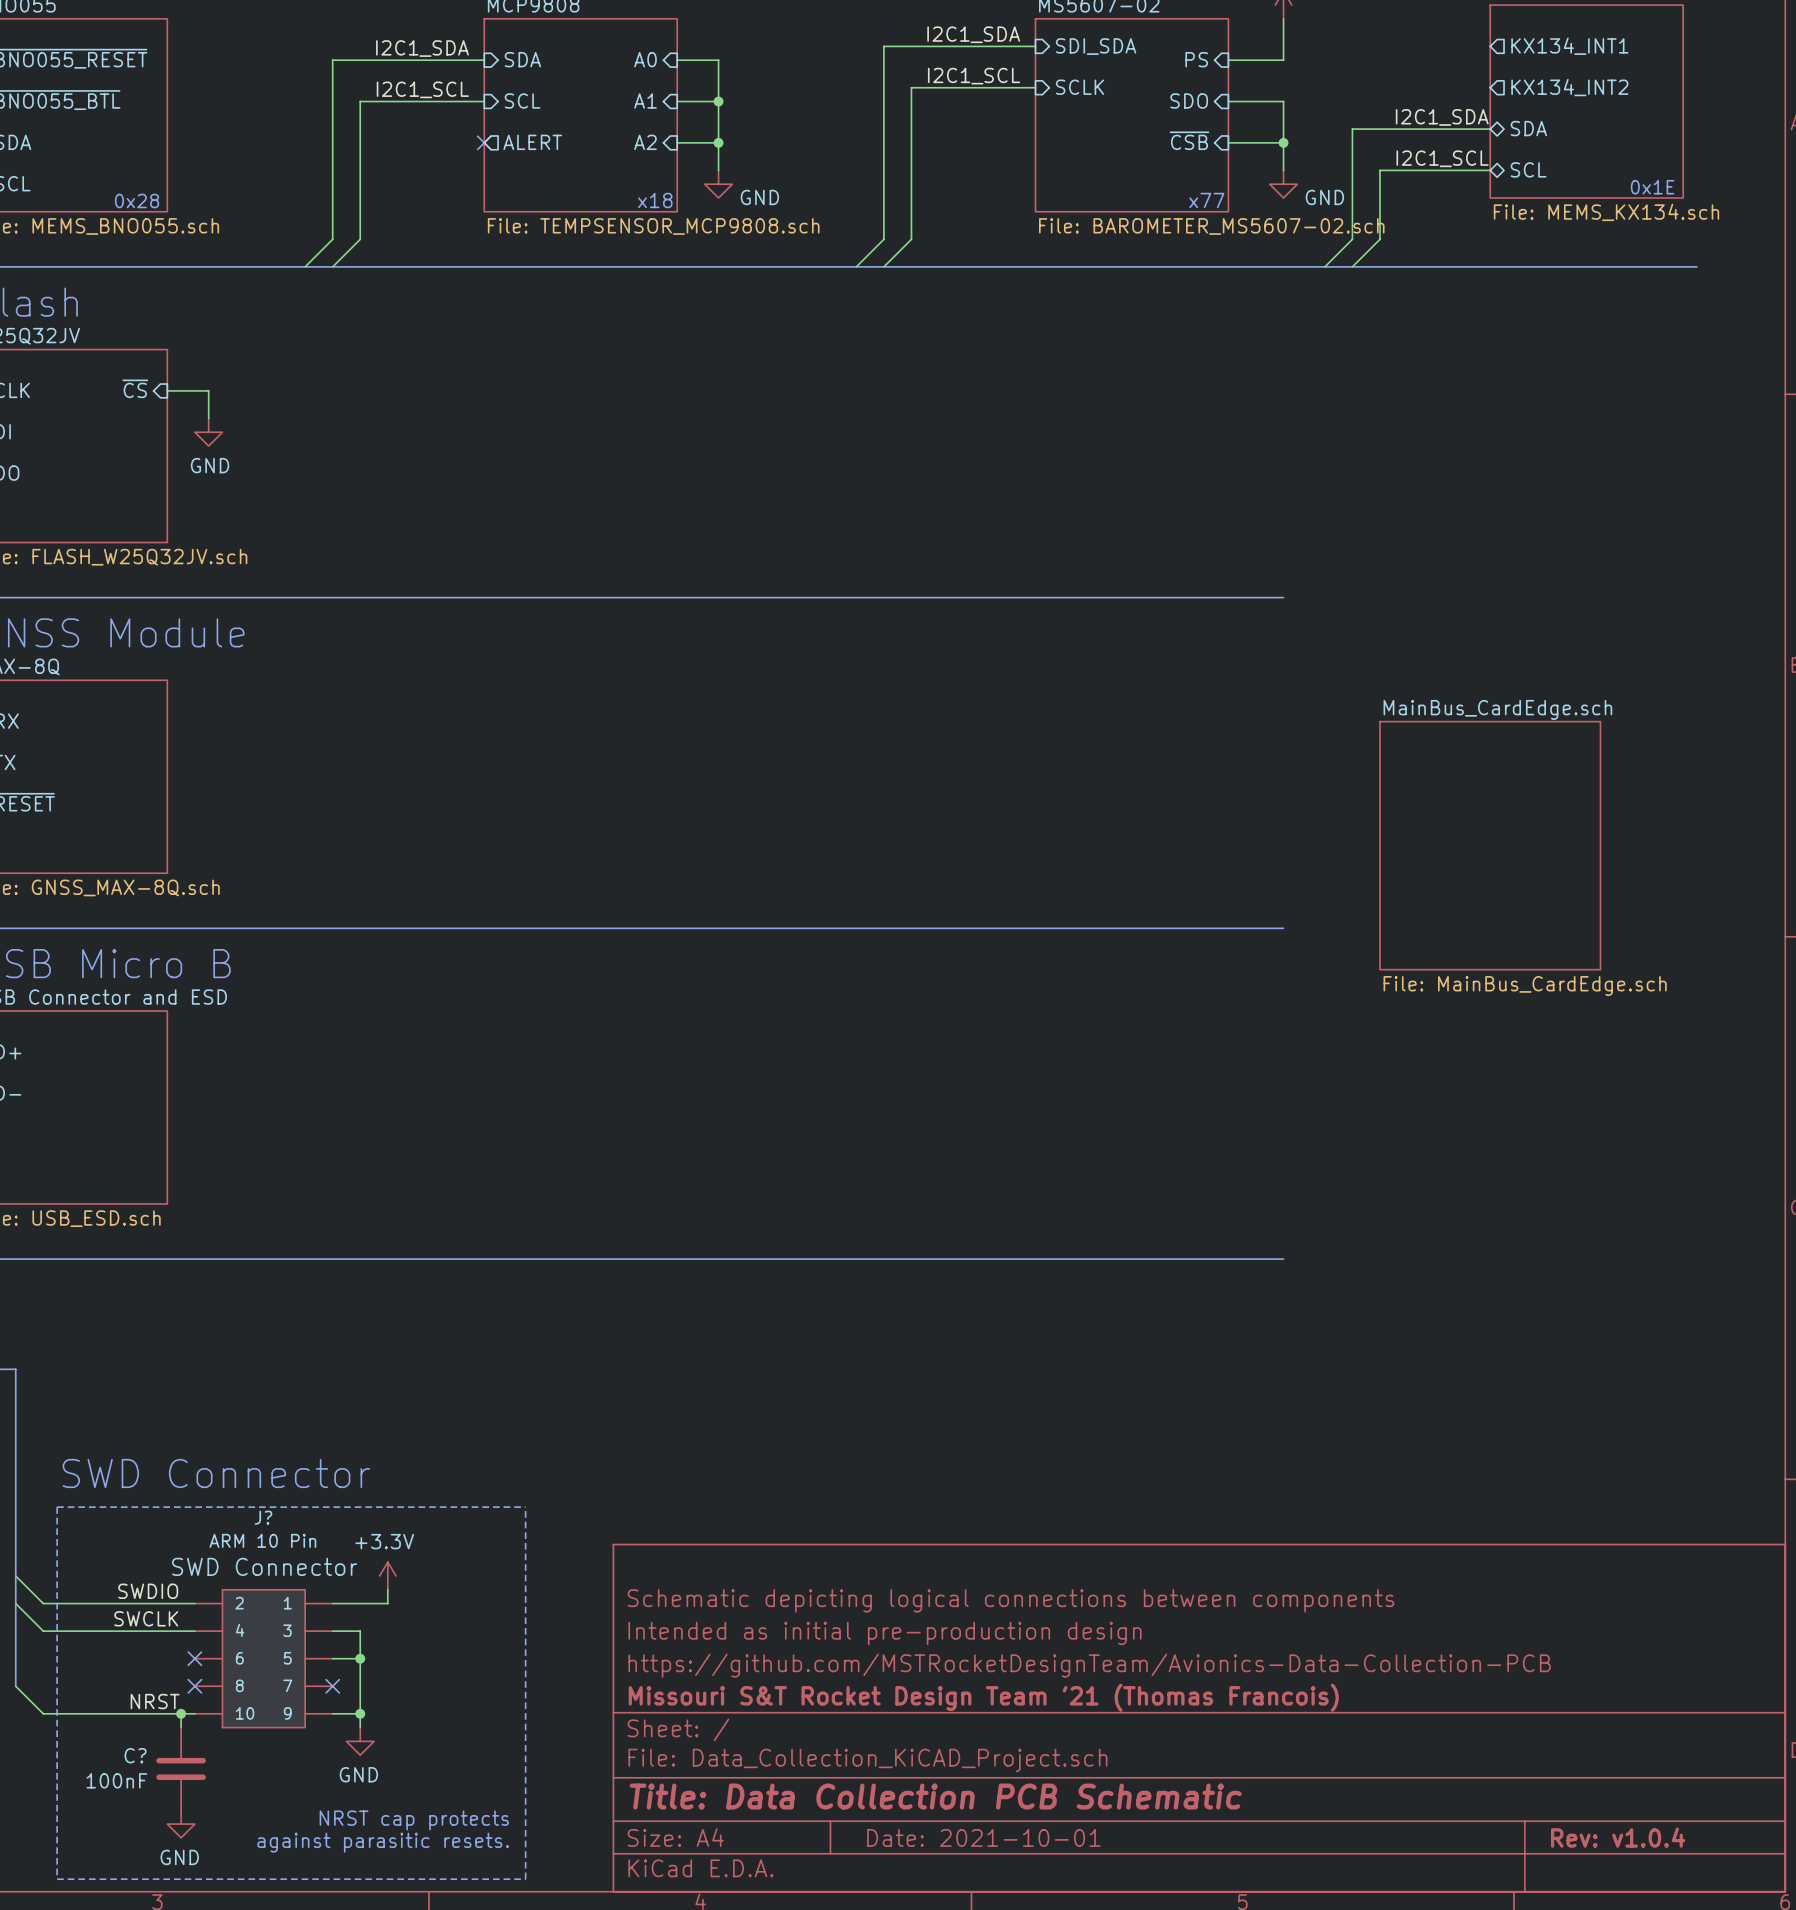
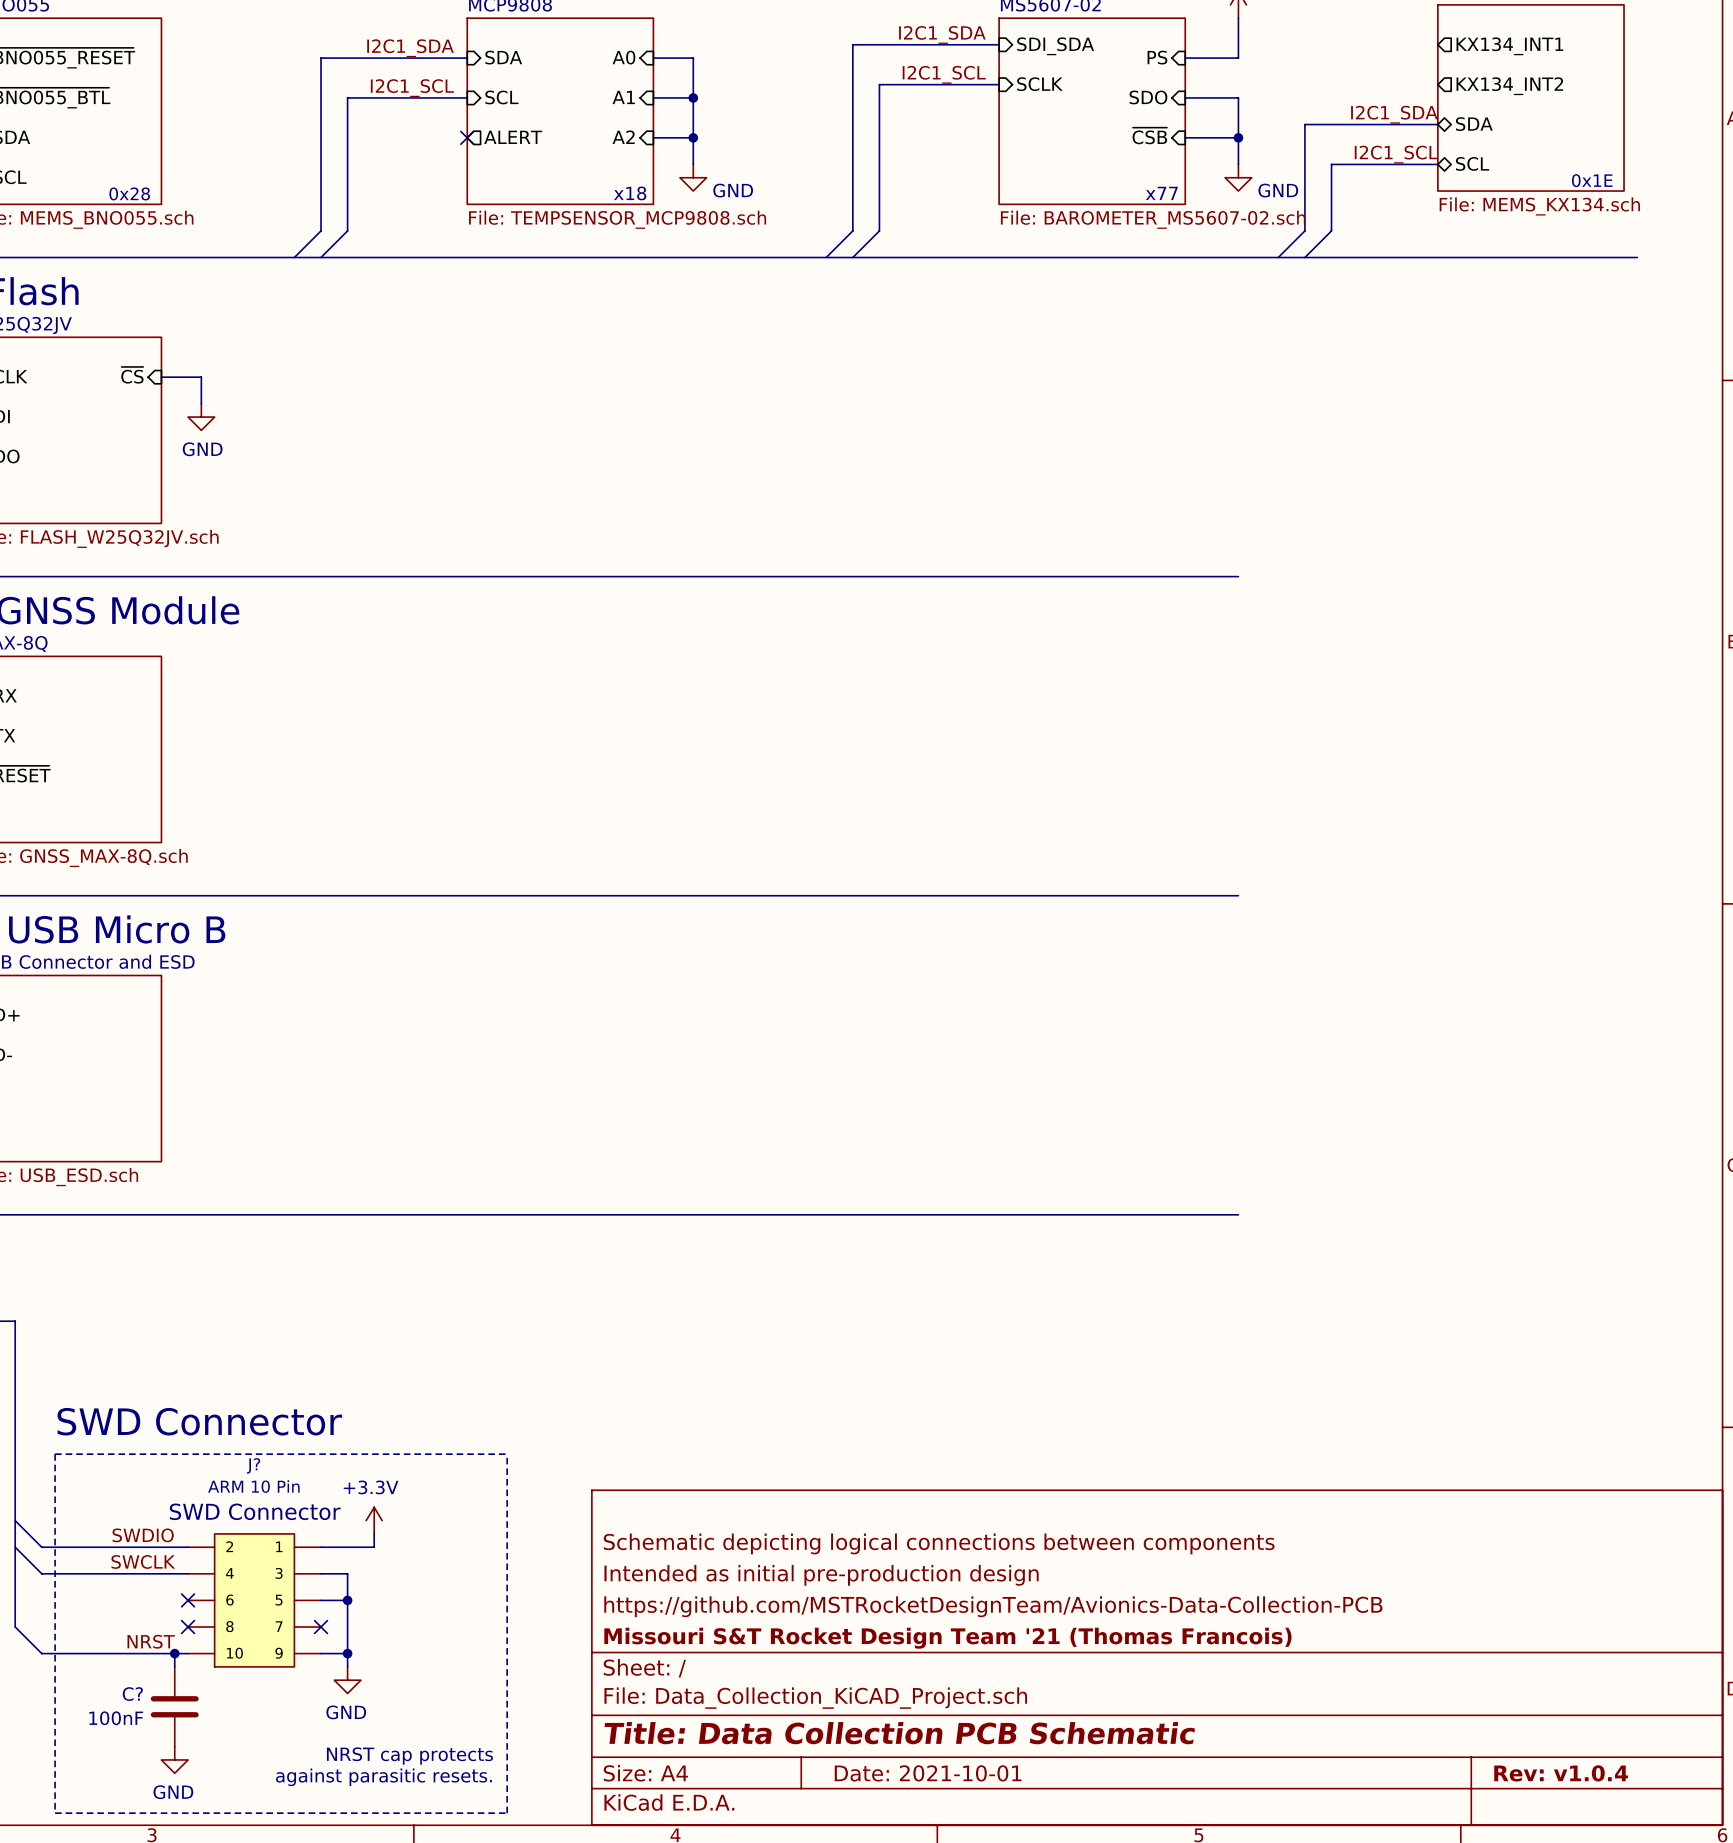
sheet MainBus_CardEdge.sch: File: MainBus_CardEdge.sch (1490, 845) -> none

